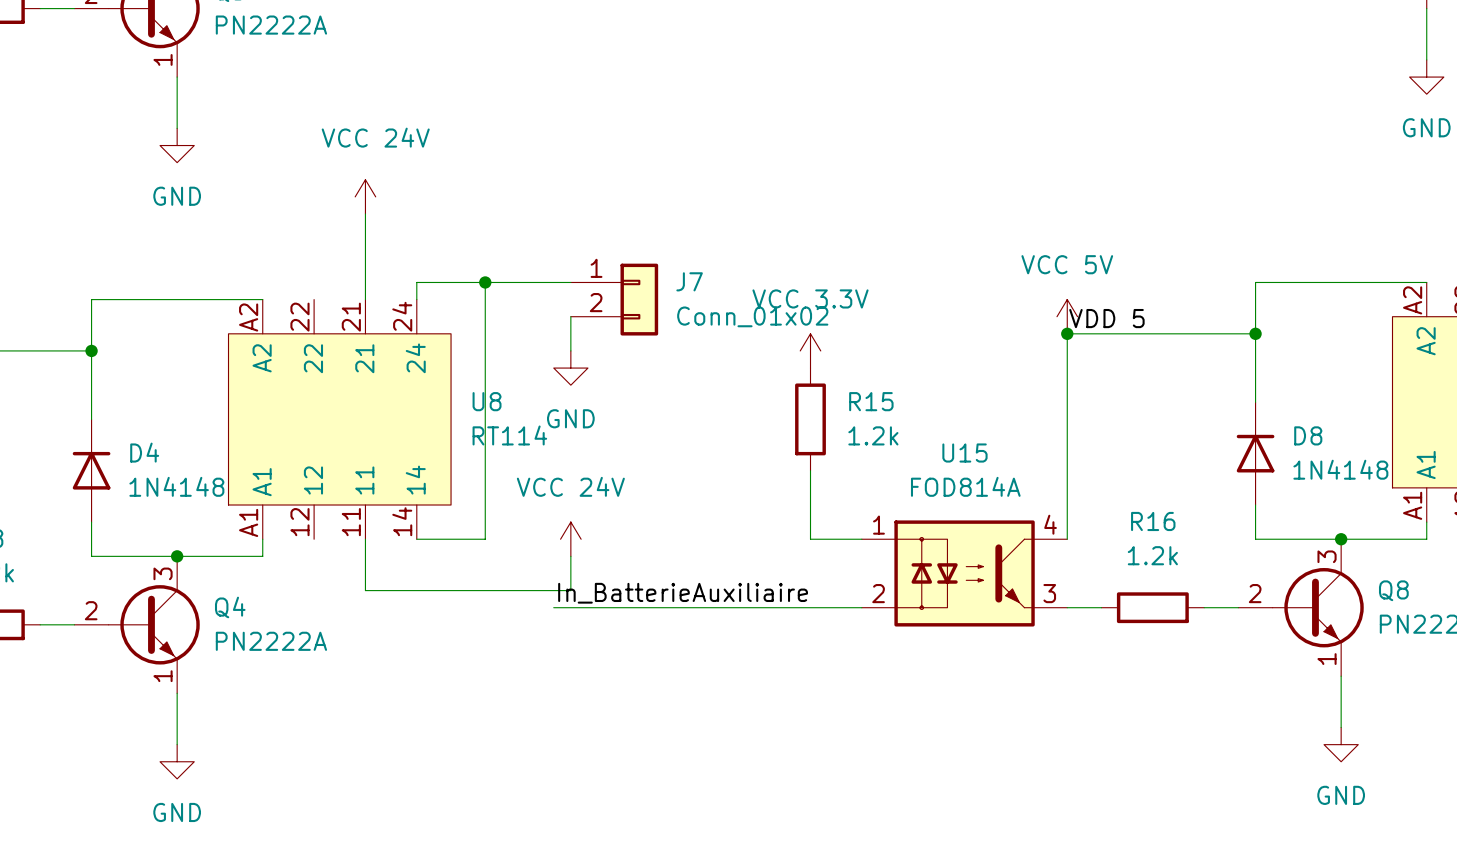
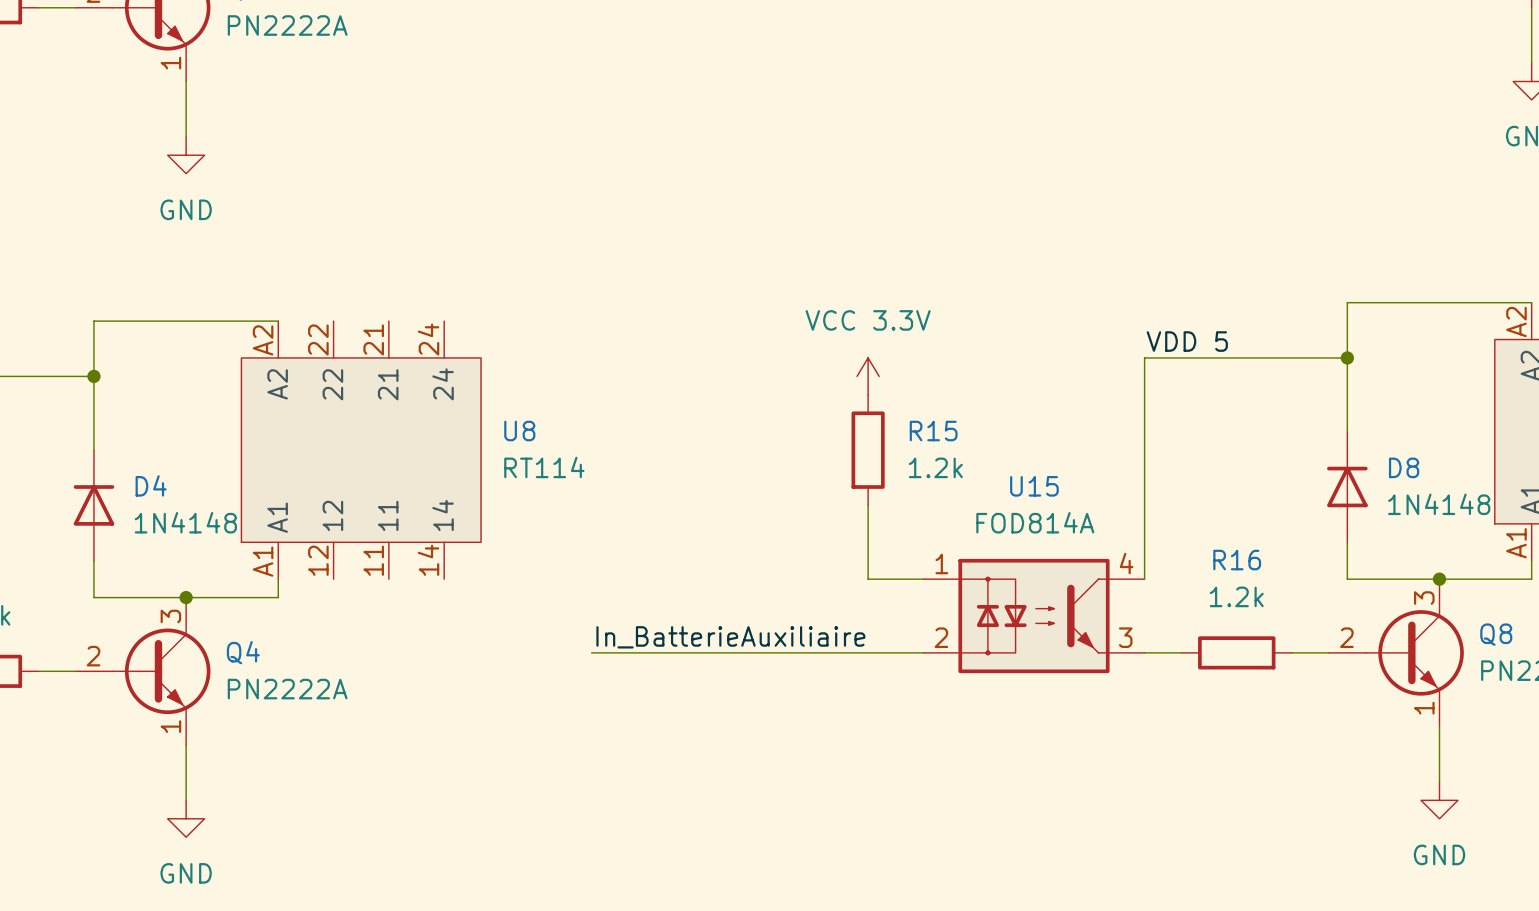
power symbol: VCC 24V (365, 196) -> none
wire: (365, 214) (365, 299) -> none
wire: (485, 282) (485, 539) (416, 539) -> none
junction: (485, 282) -> none
wire: (570, 282) (416, 282) (416, 299) -> none
J7: Conn_01x02 (614, 299) -> none
wire: (570, 316) (570, 350) -> none
power symbol: VCC 5V (1067, 316) -> none
junction: (1067, 333) -> none
power symbol: GND (570, 368) -> none
wire: (365, 539) (365, 590) (570, 590) (570, 556) -> none
power symbol: VCC 24V (570, 539) -> none

